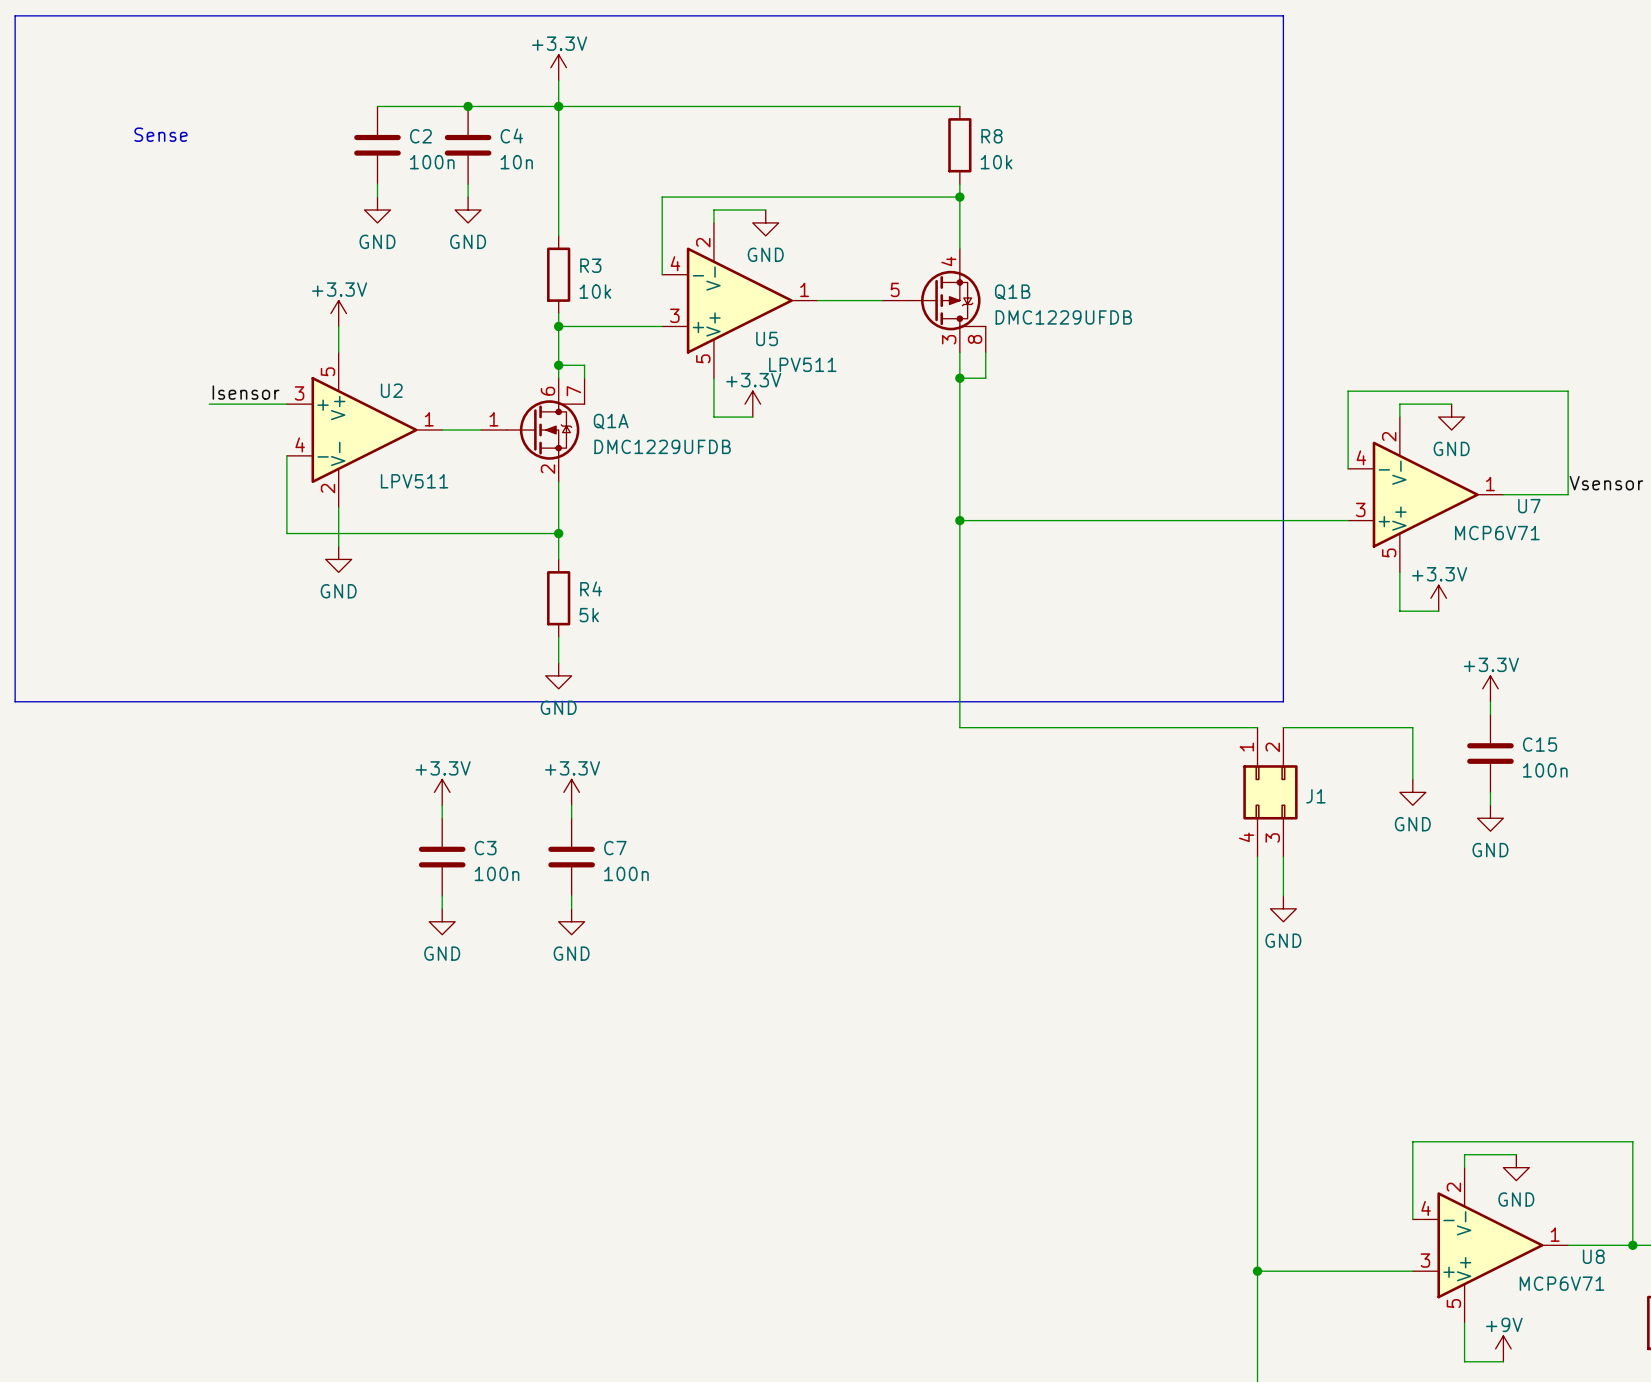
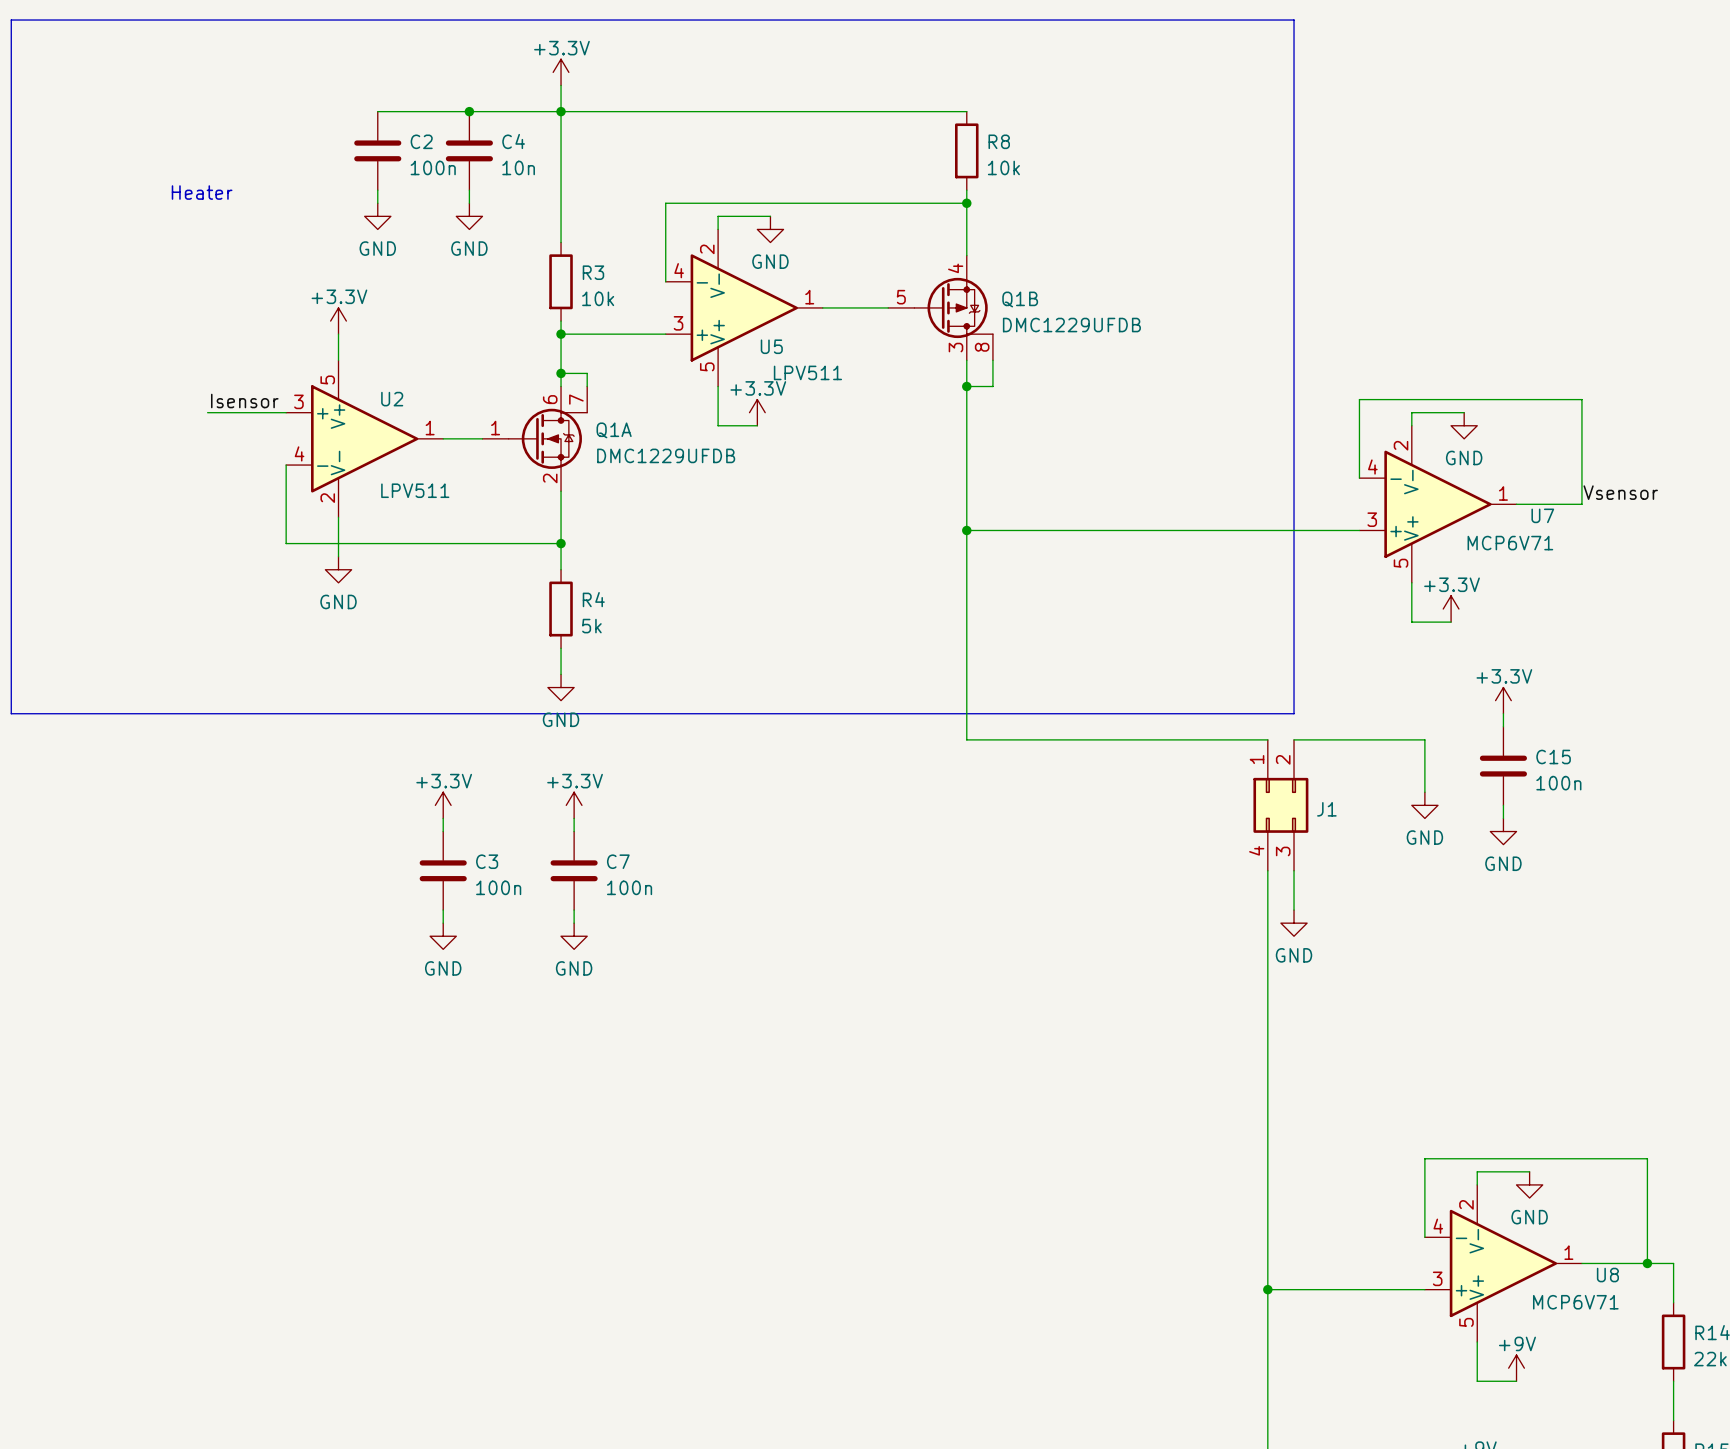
text: Sense (160, 134) -> none
text: none -> Heater (202, 192)

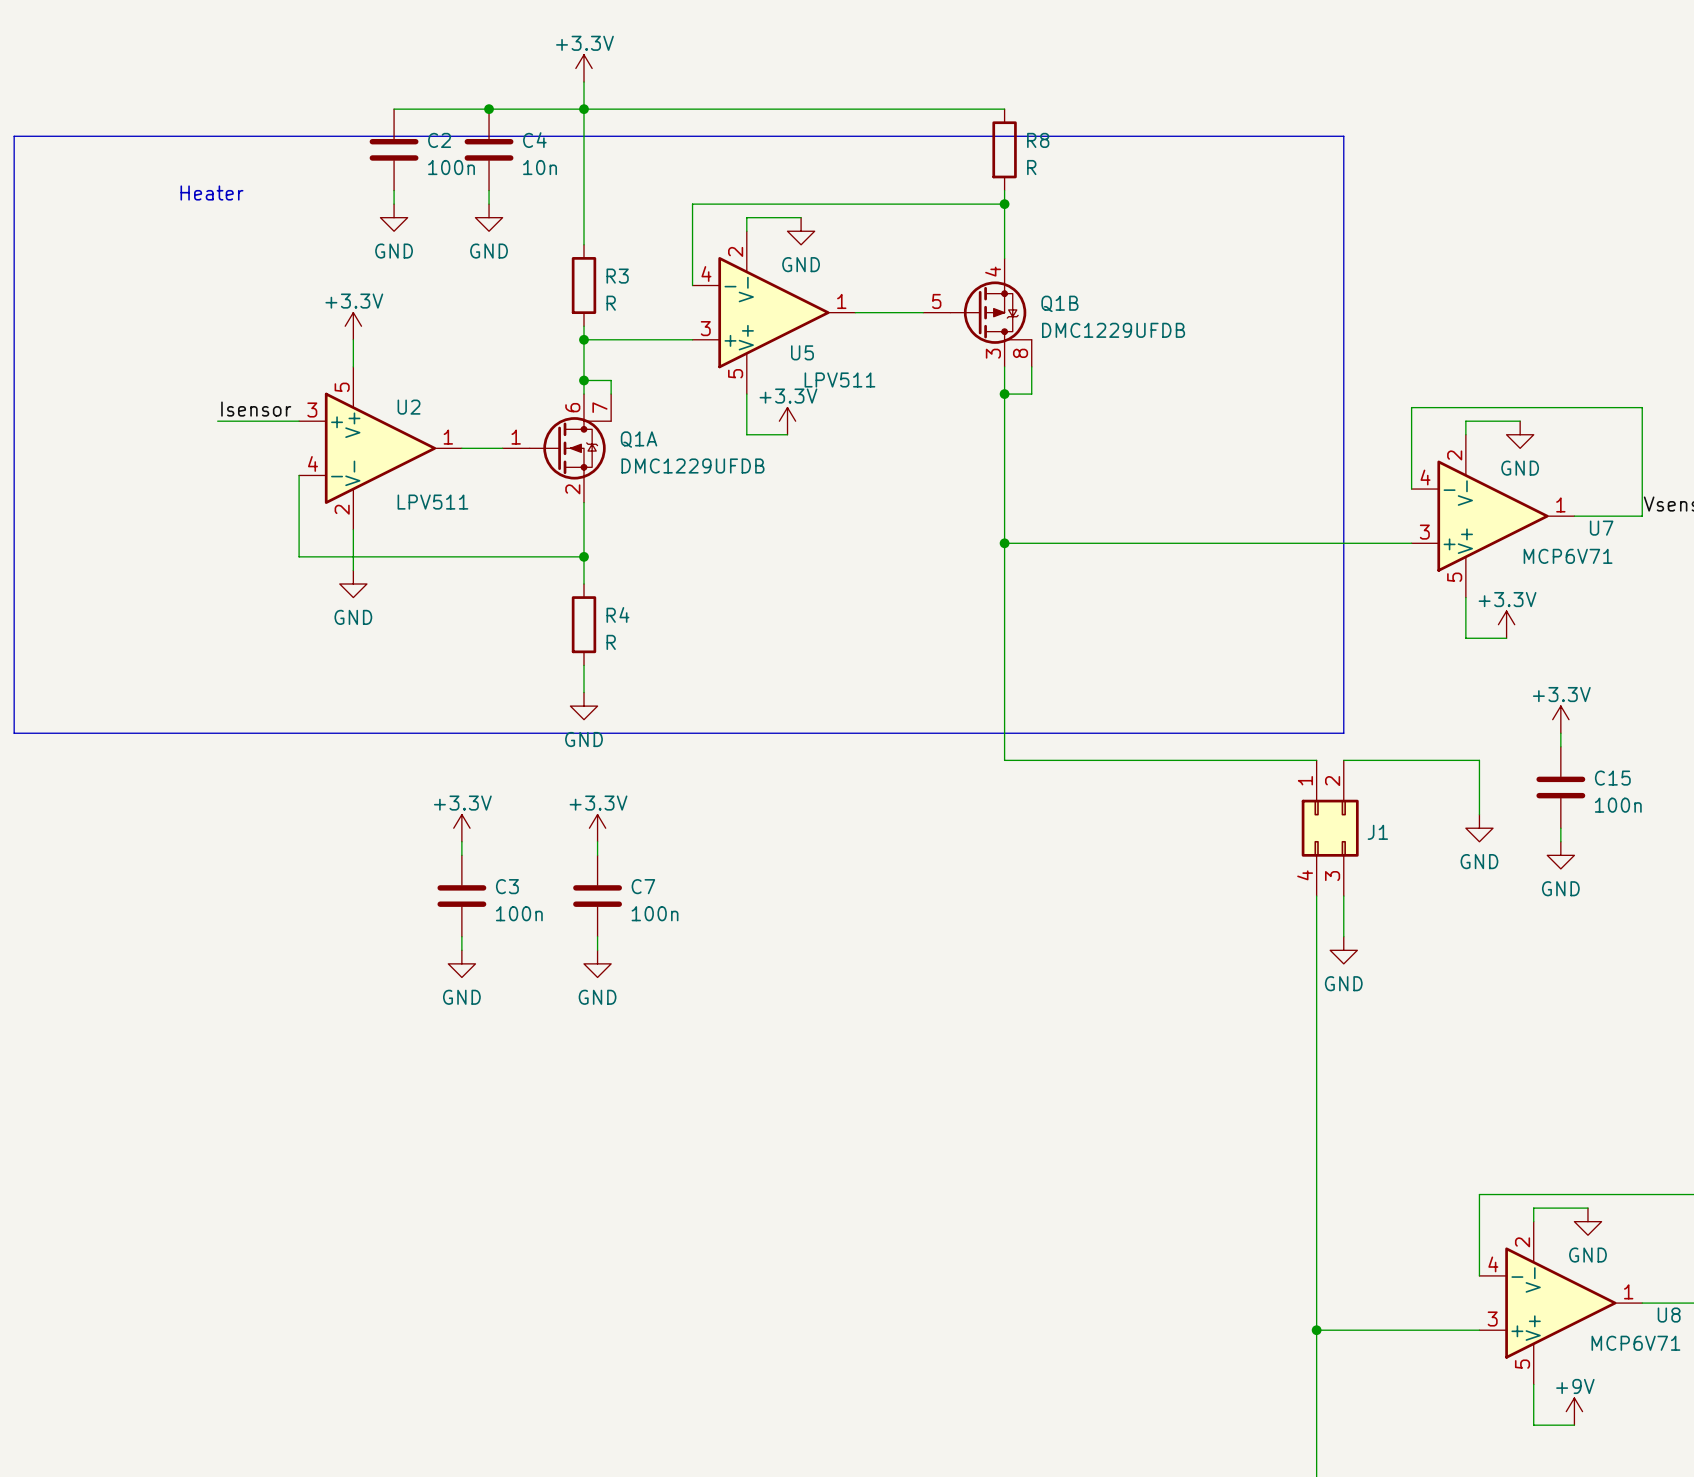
line: (11, 137) (11, 20) (1294, 20) (1294, 137) -> (14, 136) (1343, 136)
R8 value: 10k (1003, 167) -> R (1031, 167)
R3 value: 10k (598, 298) -> R (611, 303)
R4 value: 5k (591, 626) -> R (611, 642)

